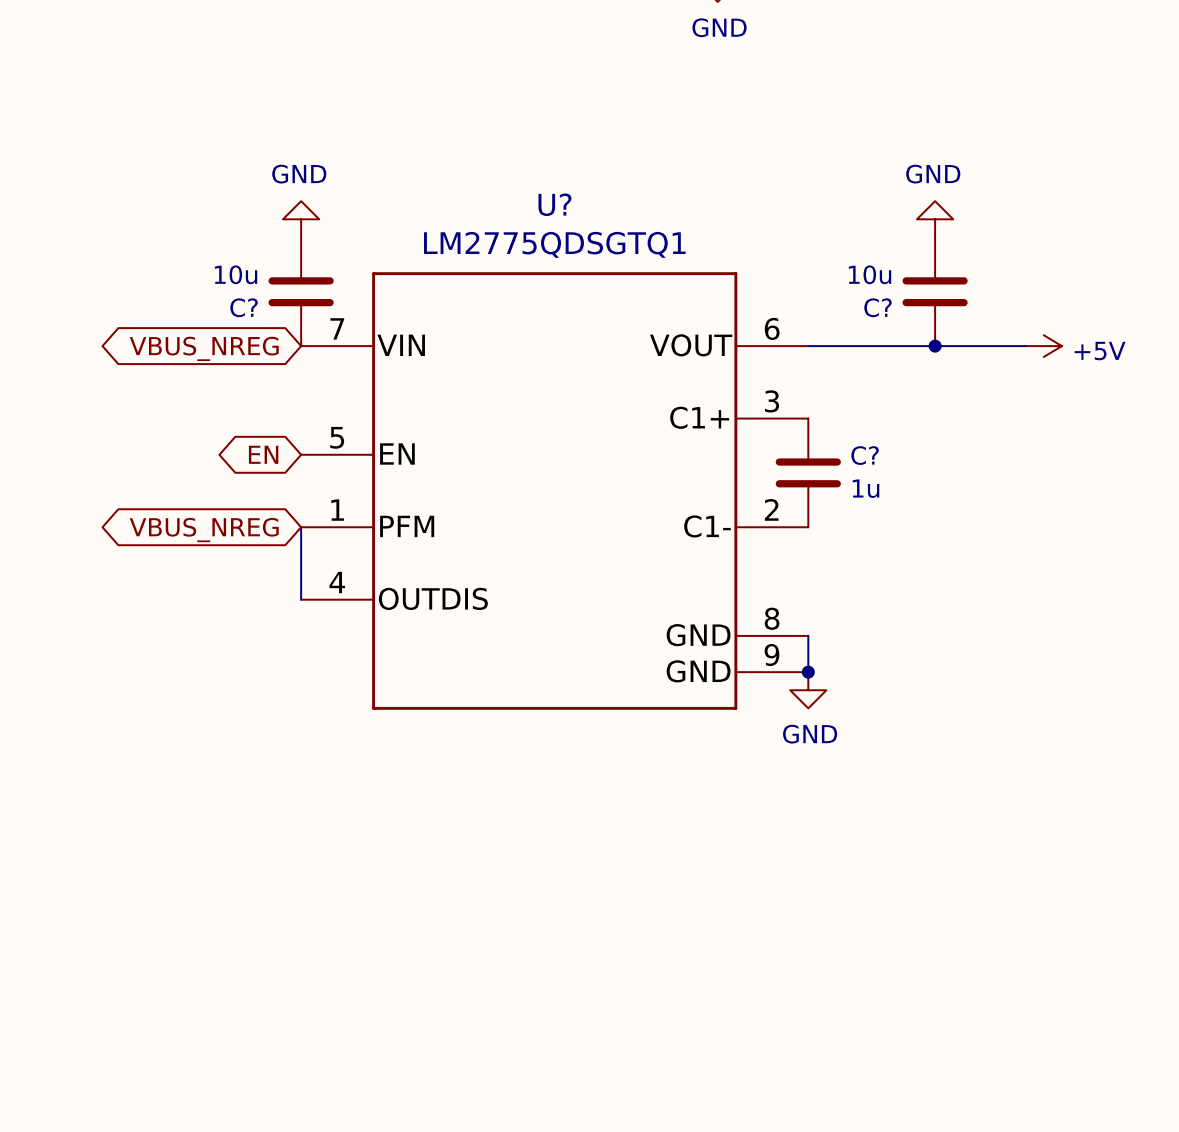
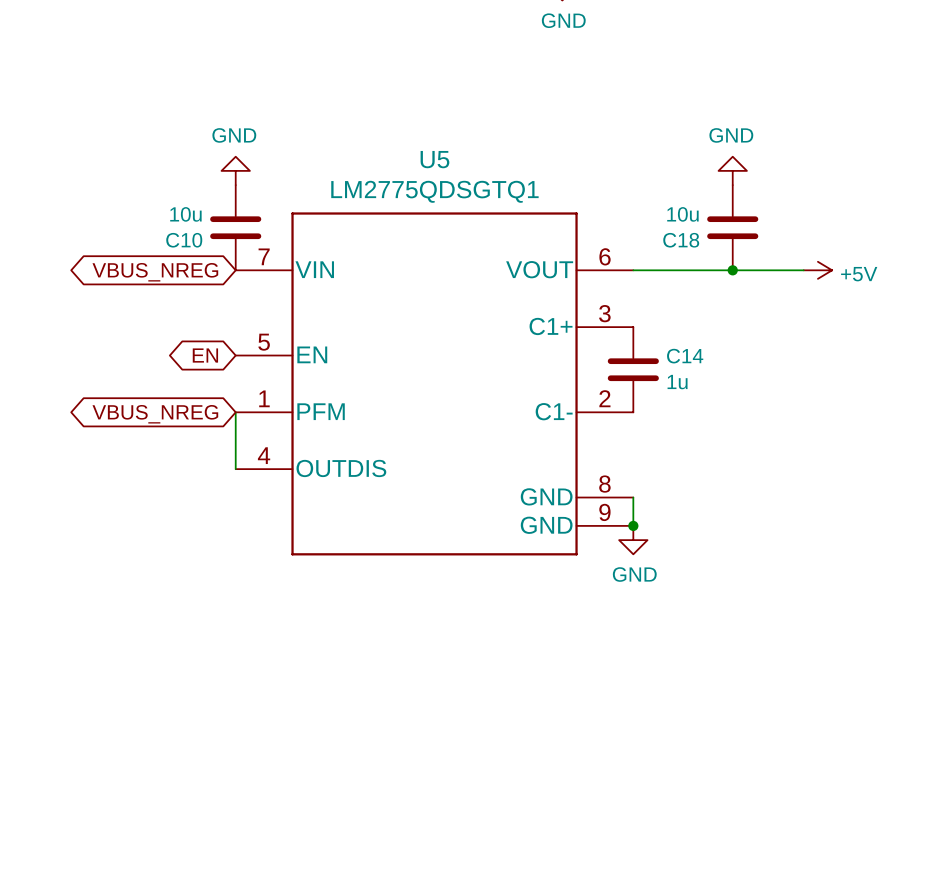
U? name: U? (554, 204) -> U5 (434, 159)
C? name: C? (244, 307) -> C10 (184, 240)
C? name: C? (878, 307) -> C18 (681, 240)
C? name: C? (865, 455) -> C14 (685, 356)

